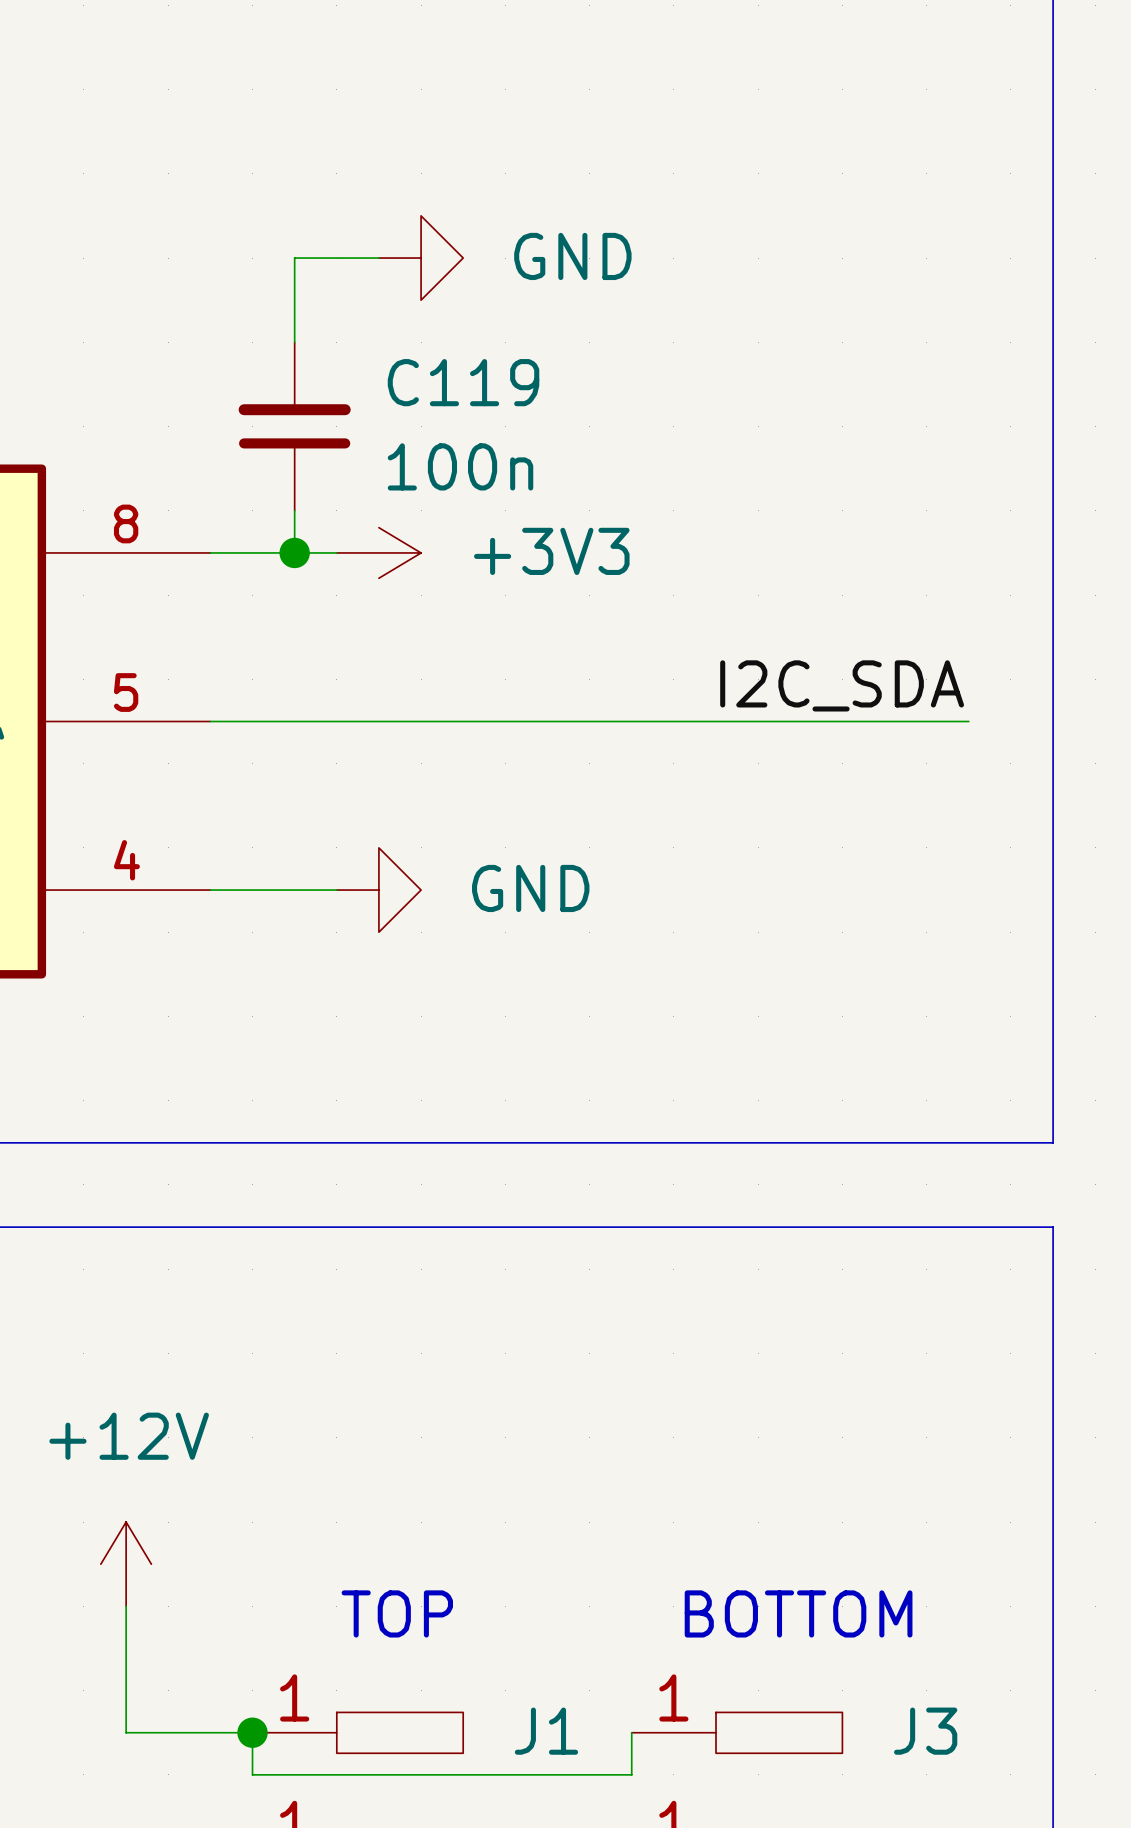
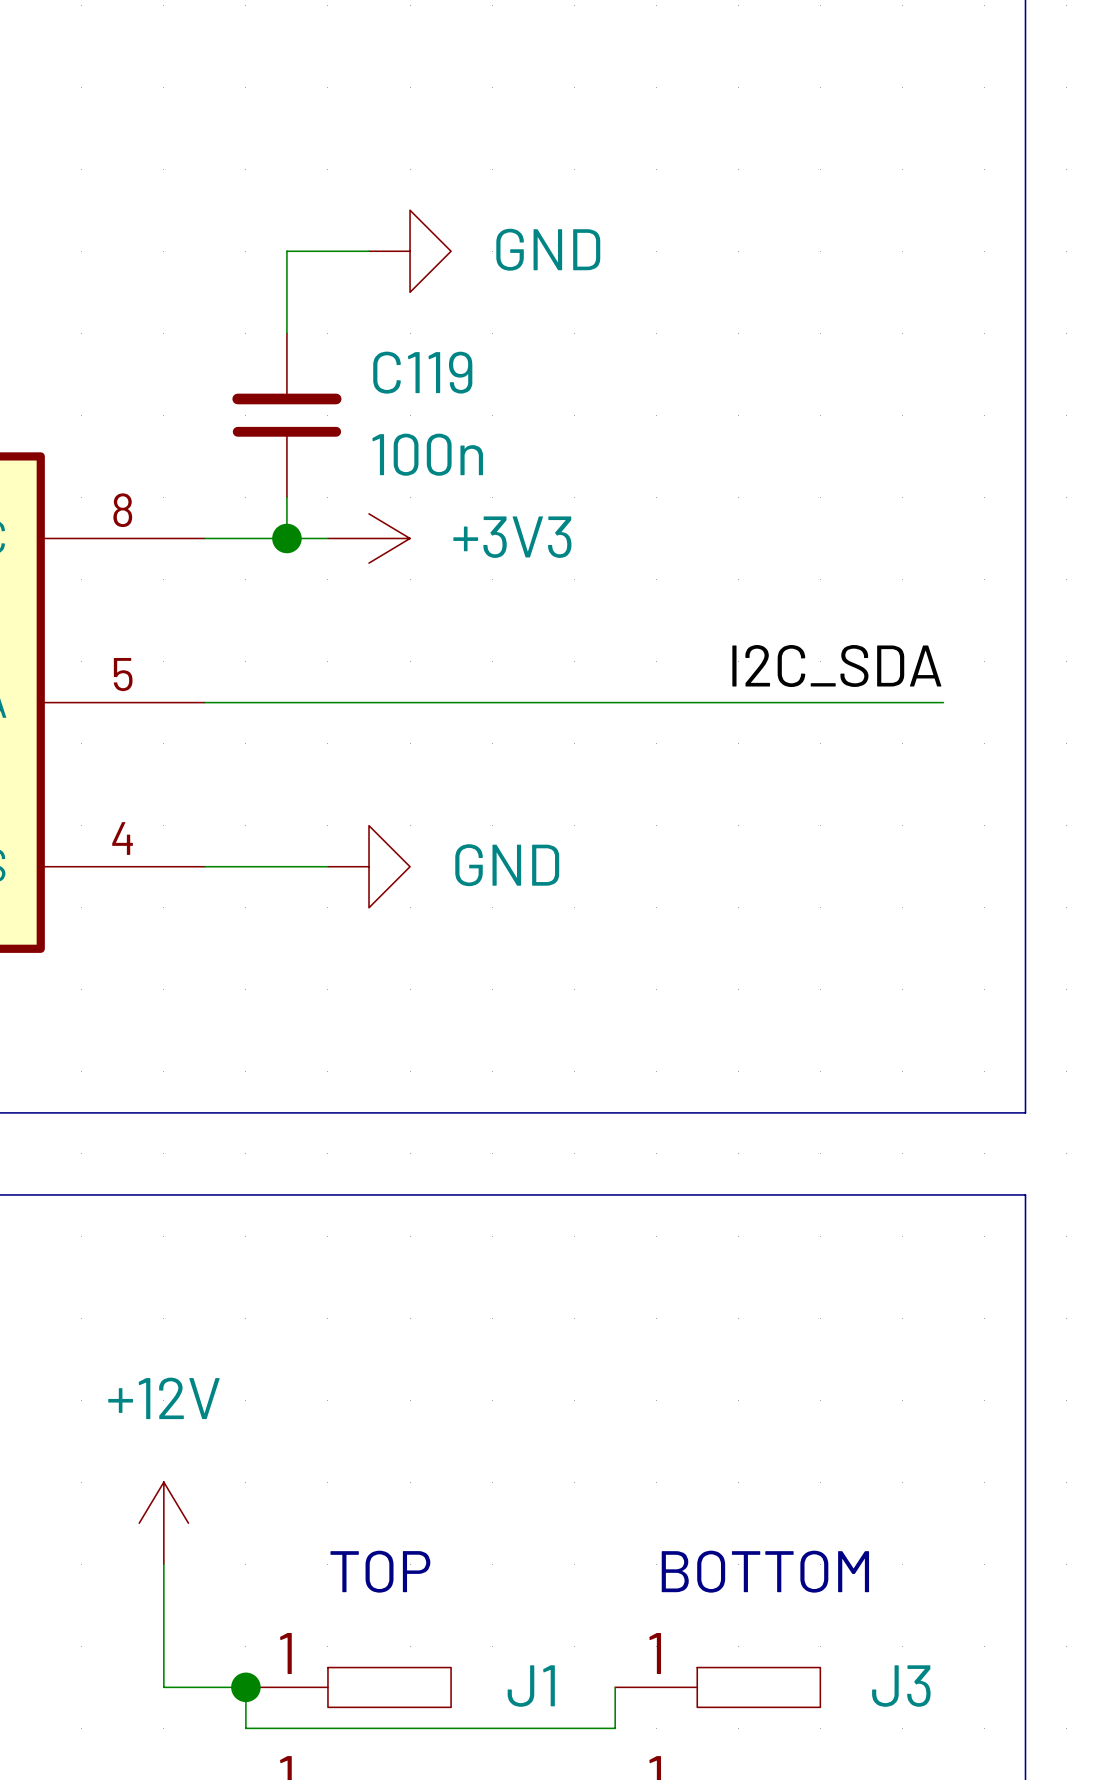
power symbol position: +12V (126, 1564) -> +12V (163, 1523)
wire: (126, 1606) (126, 1732) (168, 1732) -> (163, 1564) (163, 1687)

